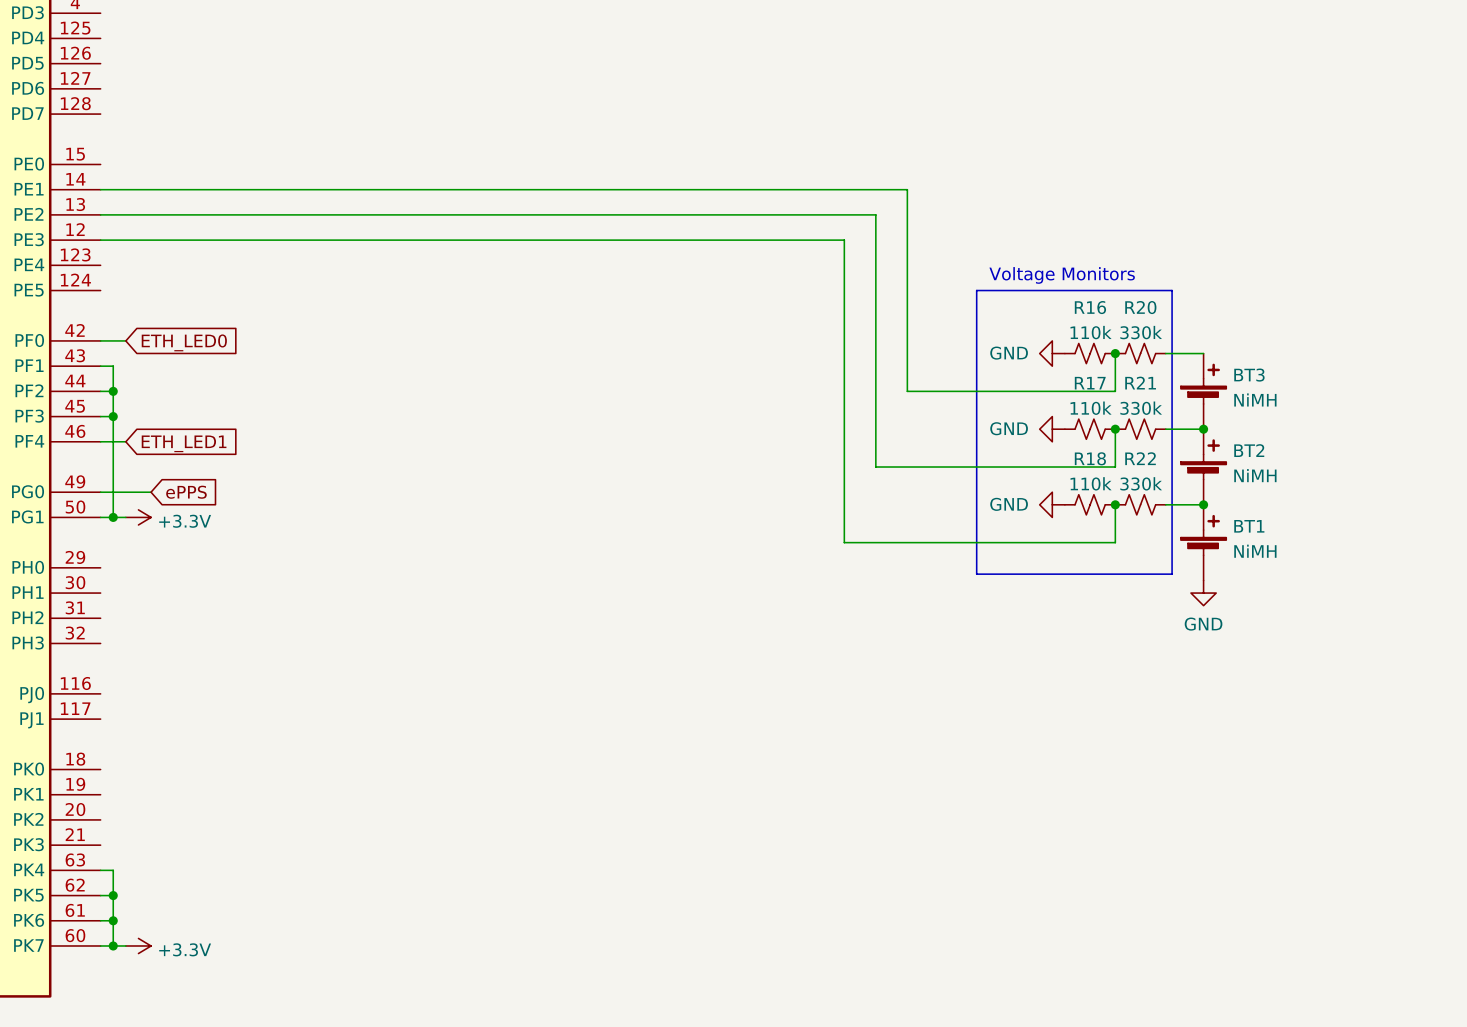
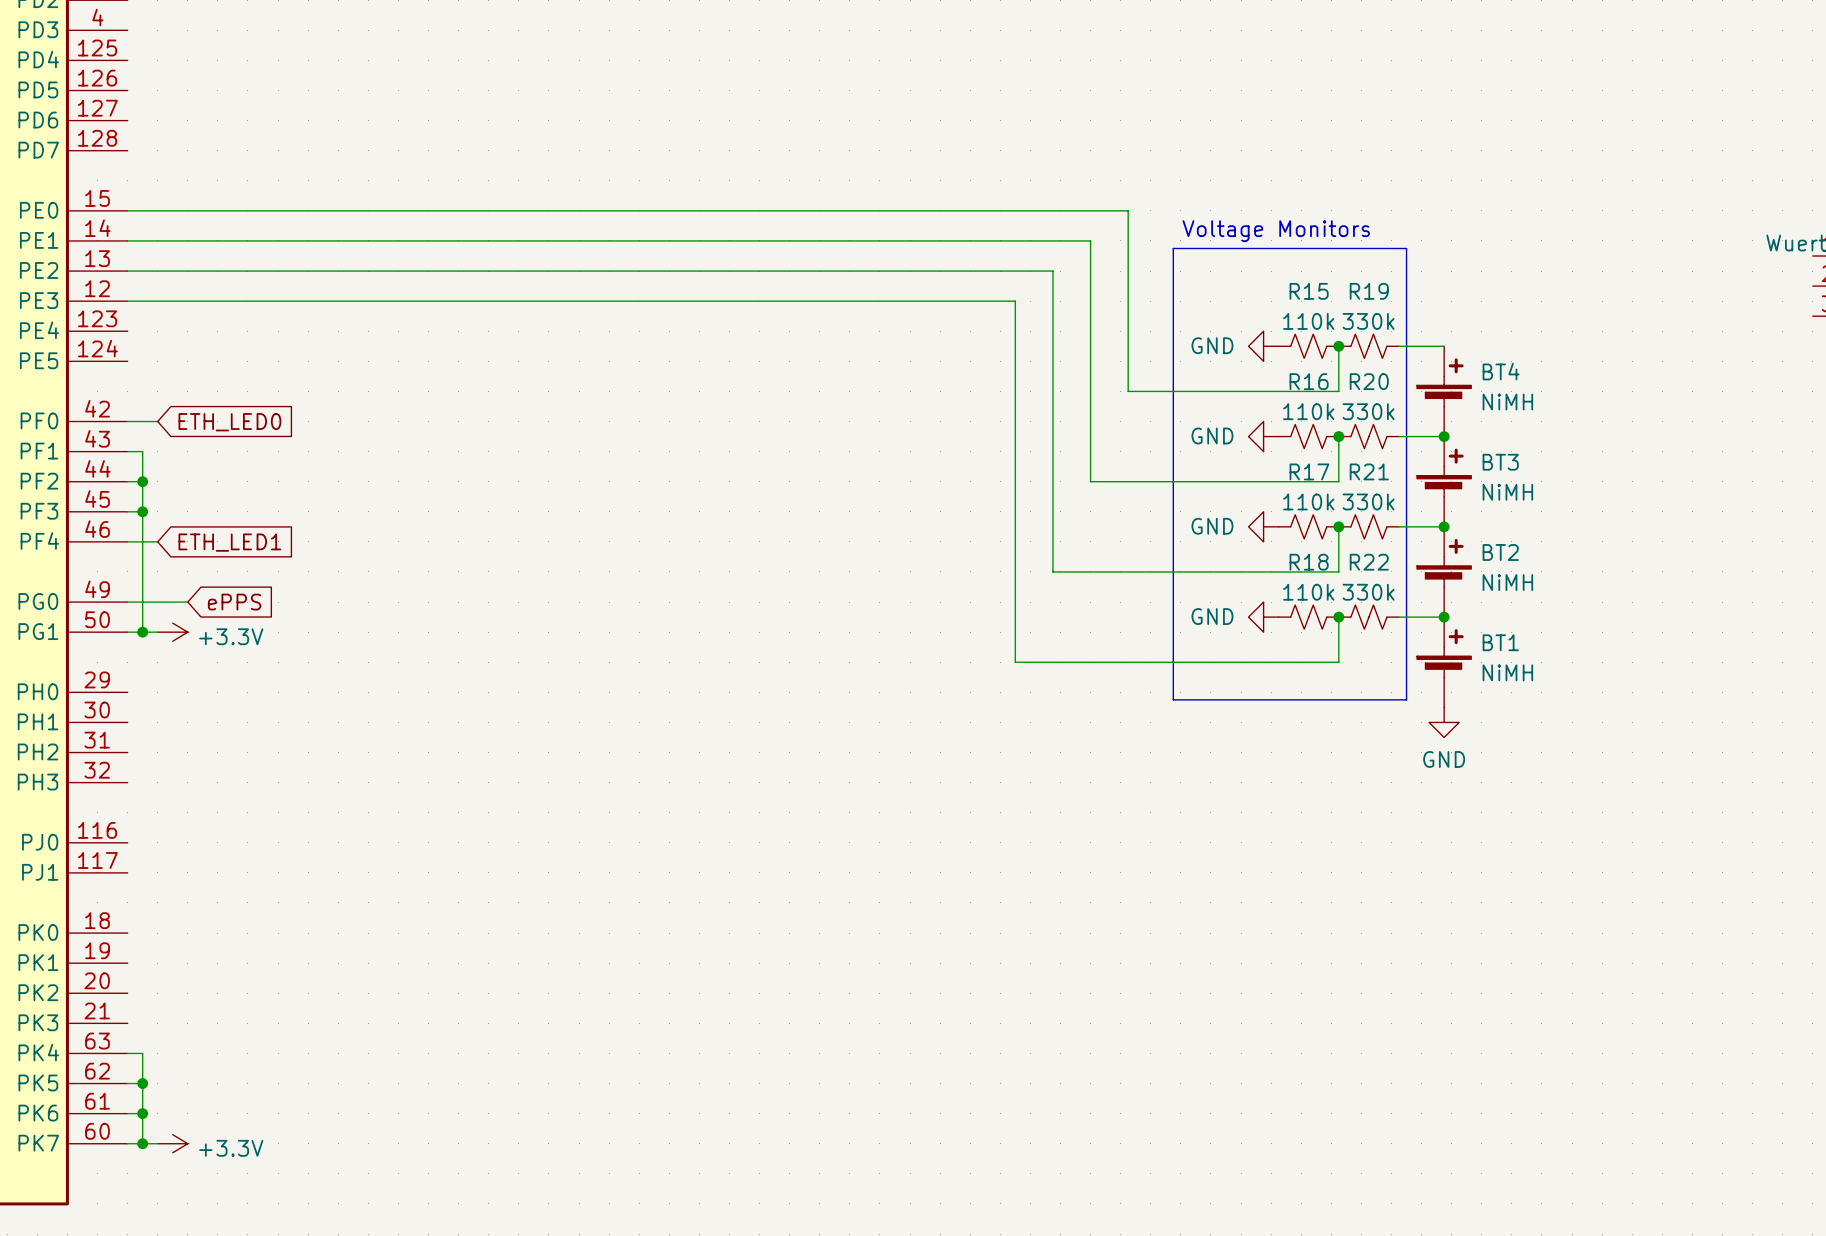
wire: none -> (127, 210) (1128, 210) (1128, 391) (1338, 391) (1338, 346)
text position: Voltage Monitors (1062, 275) -> Voltage Monitors (1276, 231)
power symbol: none -> GND (1263, 346)
R15: none -> 110k (1308, 346)
junction: none -> (1338, 346)
R19: none -> 330k (1368, 346)
wire: none -> (1399, 346) (1444, 346)
line: (976, 290) (1172, 290) -> (1173, 361) (1173, 248) (1406, 248) (1406, 361)
BT4: none -> NiMH (1444, 391)
junction: none -> (1444, 436)

